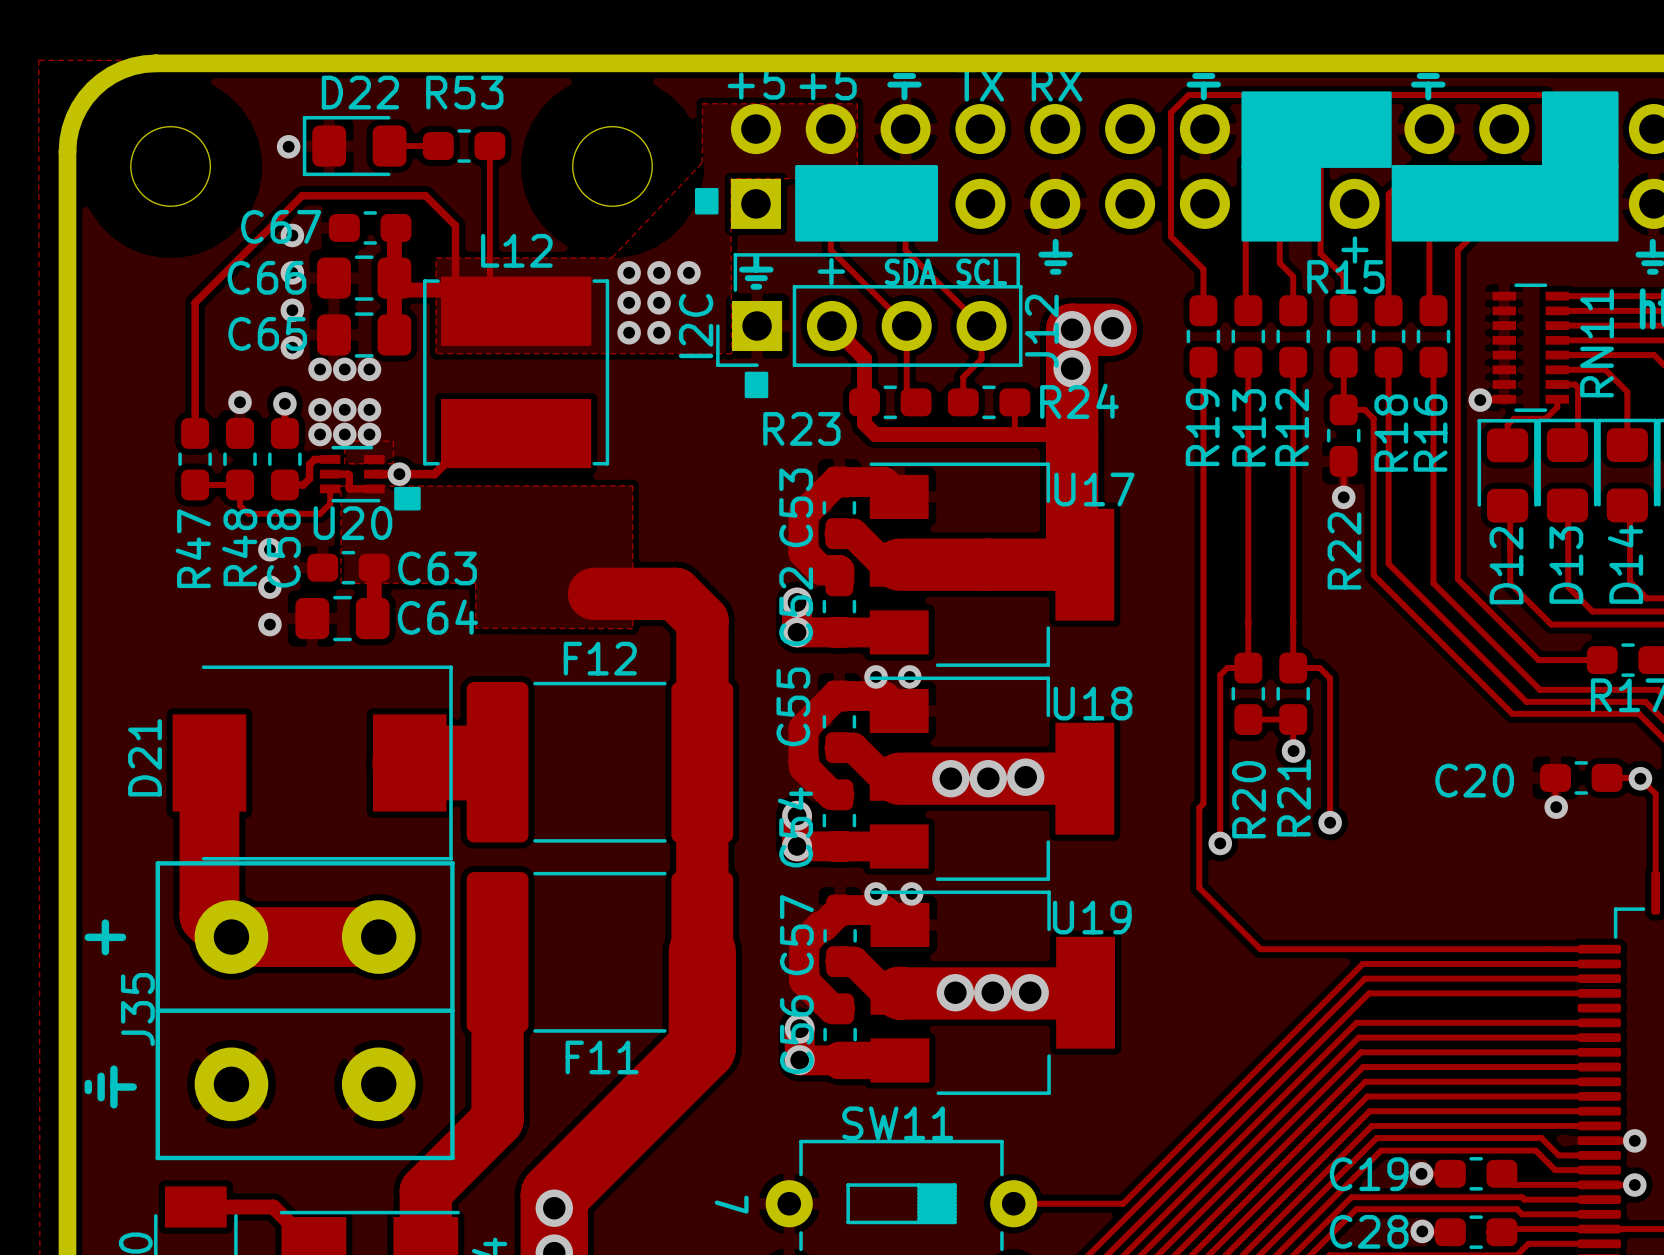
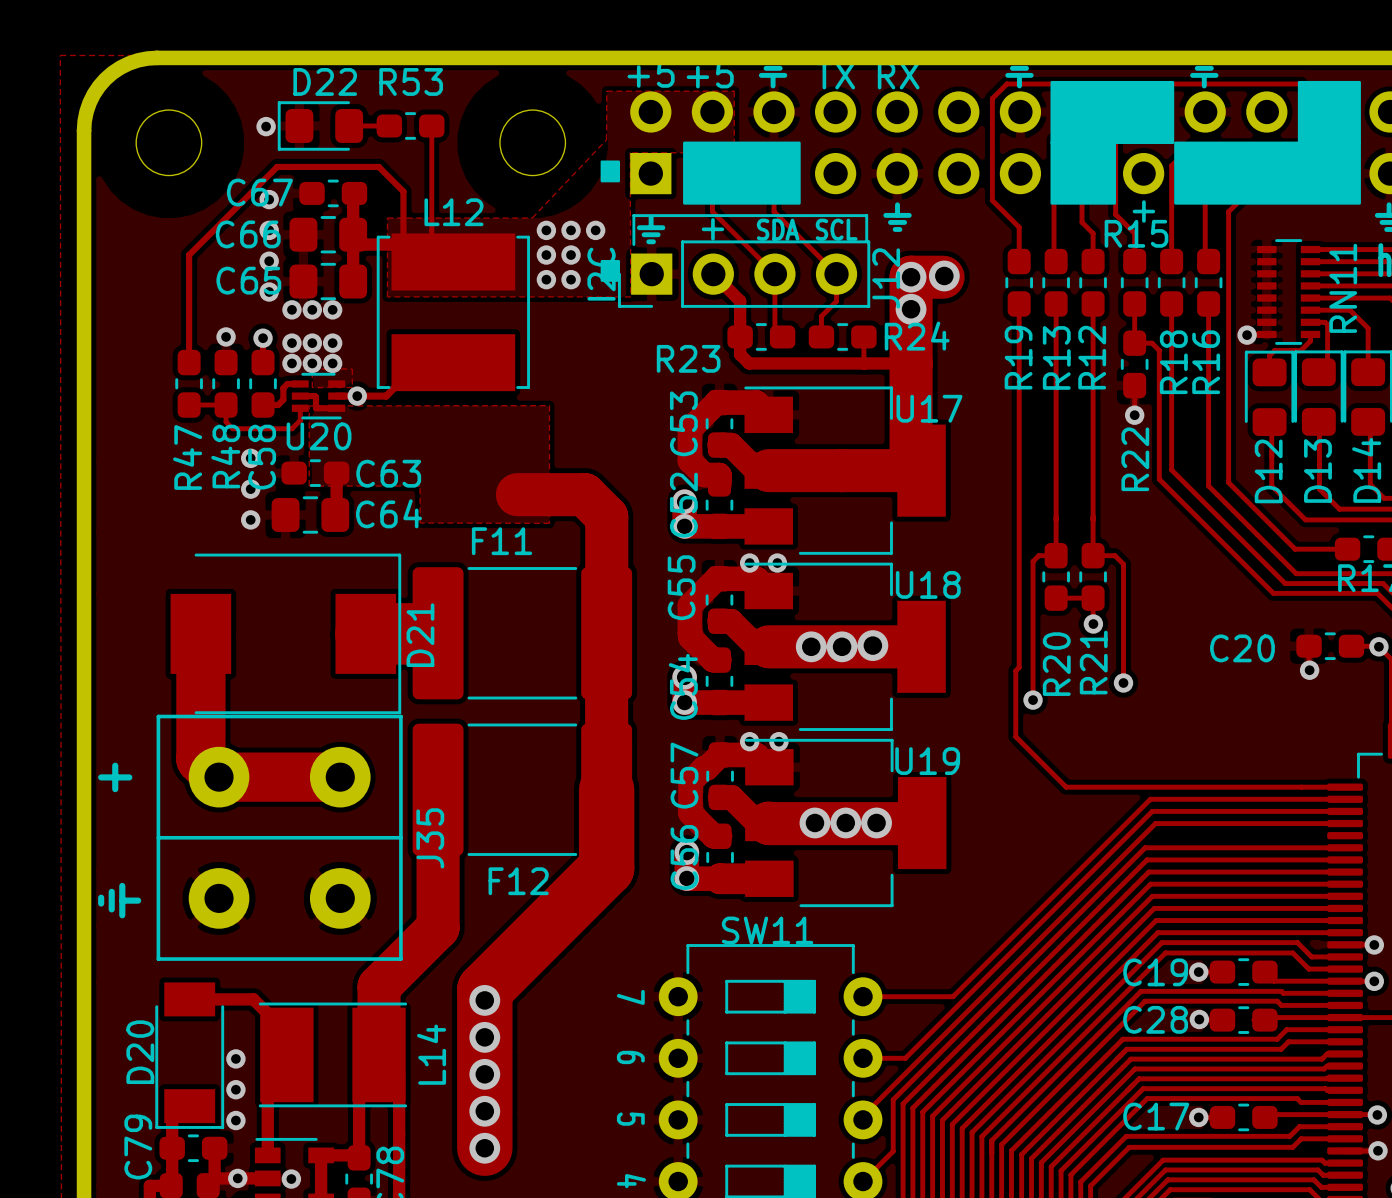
drawing position: (756, 384) -> (610, 270)
drawing: [394, 486, 421, 511] -> none
F12 name position: F12 (600, 658) -> F12 (518, 881)
D21 name position: D21 (144, 757) -> D21 (420, 635)
J35 name position: J35 (137, 1009) -> J35 (430, 838)
F11 name position: F11 (602, 1057) -> F11 (502, 541)

